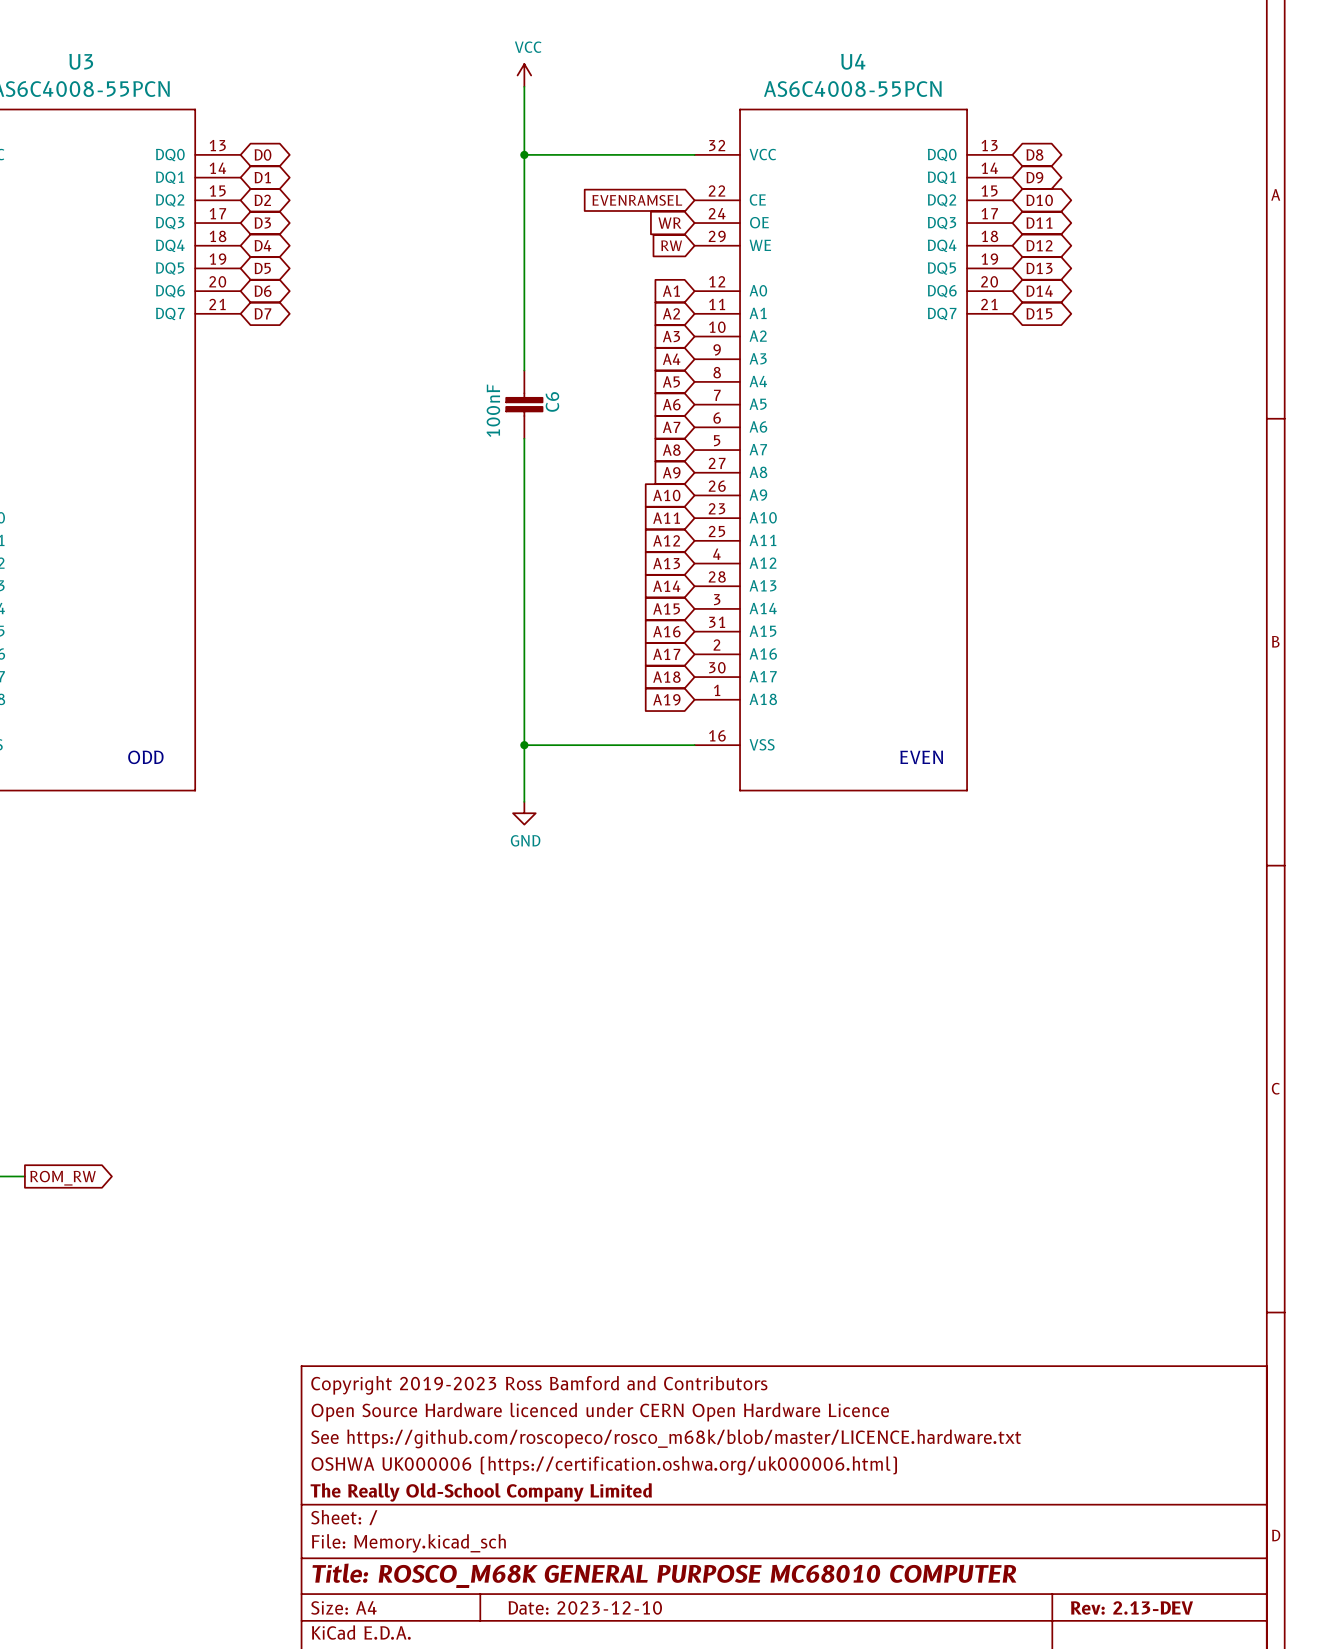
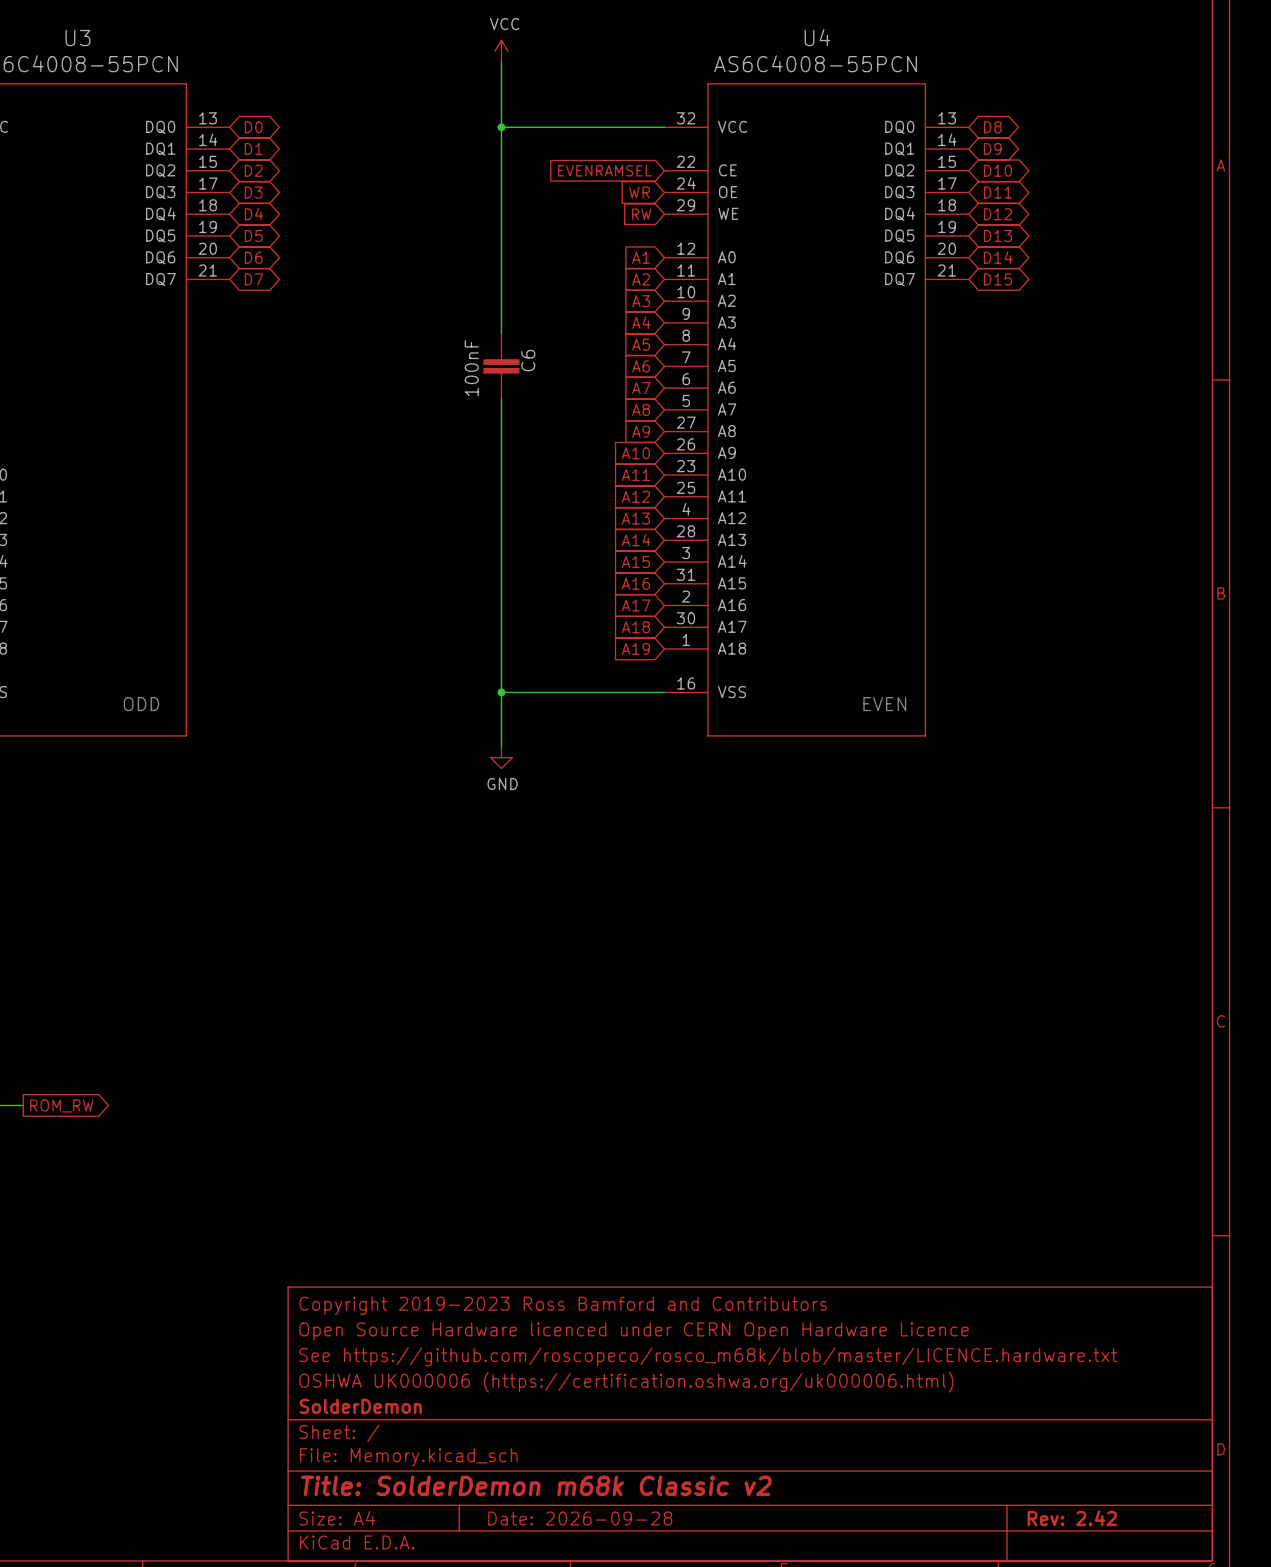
title block: The Really Old-School Company Limited (481, 1492) -> SolderDemon (360, 1406)
title block: Title: ROSCO_M68K GENERAL PURPOSE MC68010 COMPUTER (664, 1575) -> Title: SolderDemon m68k Classic v2 (536, 1485)
title block: Date: 2023-12-10 (585, 1607) -> Date: 2026-09-28 (580, 1518)
title block: Rev: 2.13-DEV (1131, 1607) -> Rev: 2.42 (1072, 1518)

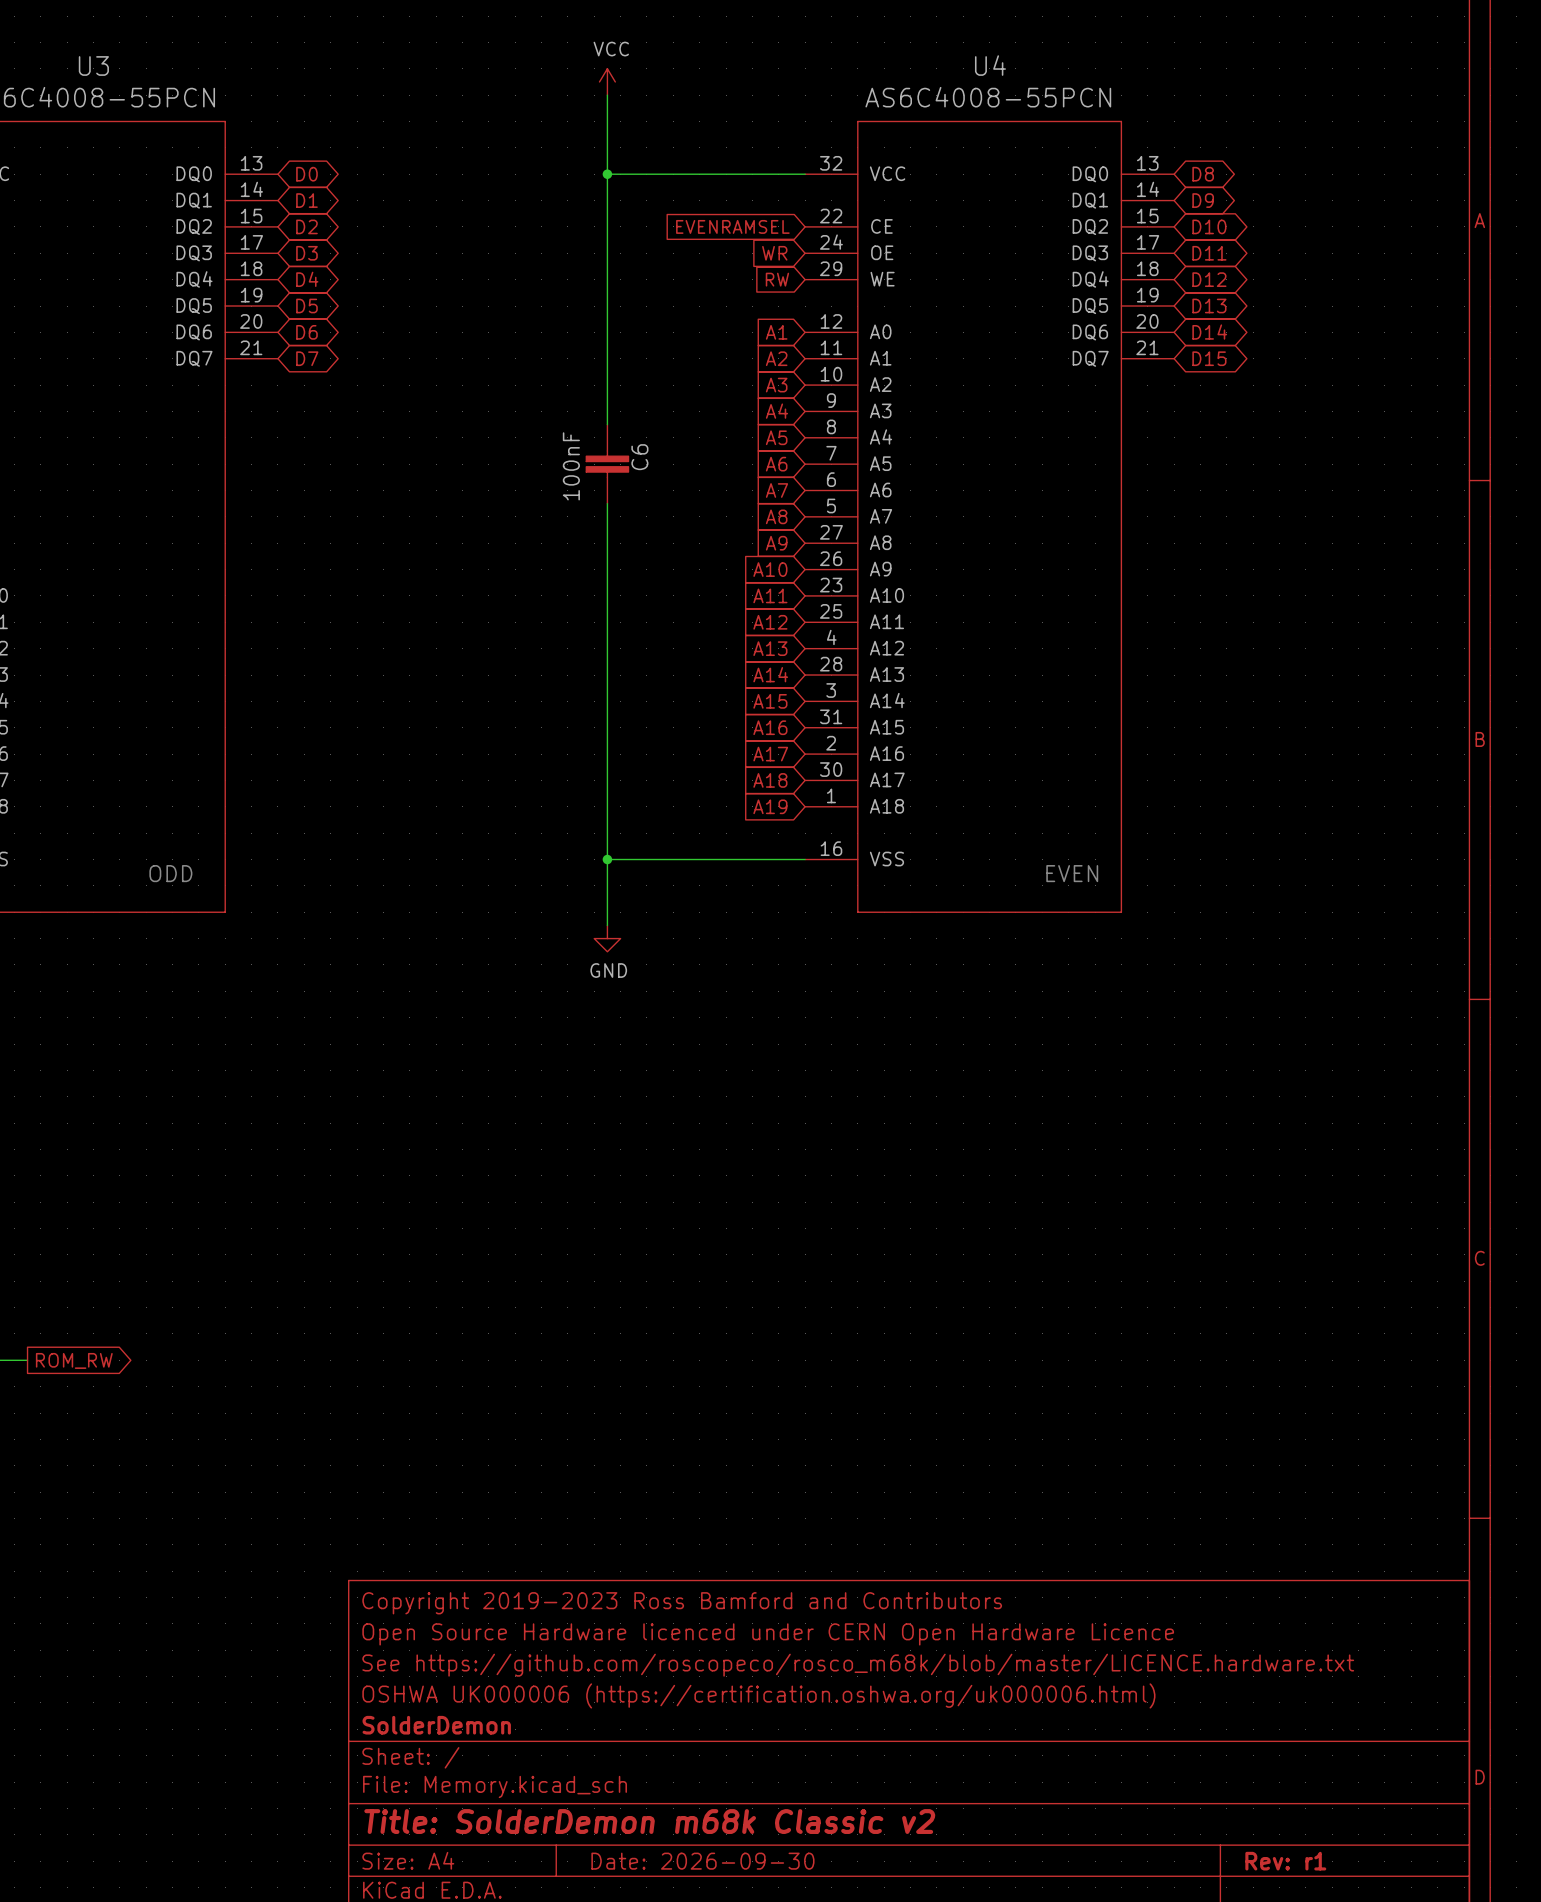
title block: Date: 2026-09-28 (580, 1518) -> Date: 2026-09-30 (702, 1861)
title block: Rev: 2.42 (1072, 1518) -> Rev: r1 (1285, 1861)

